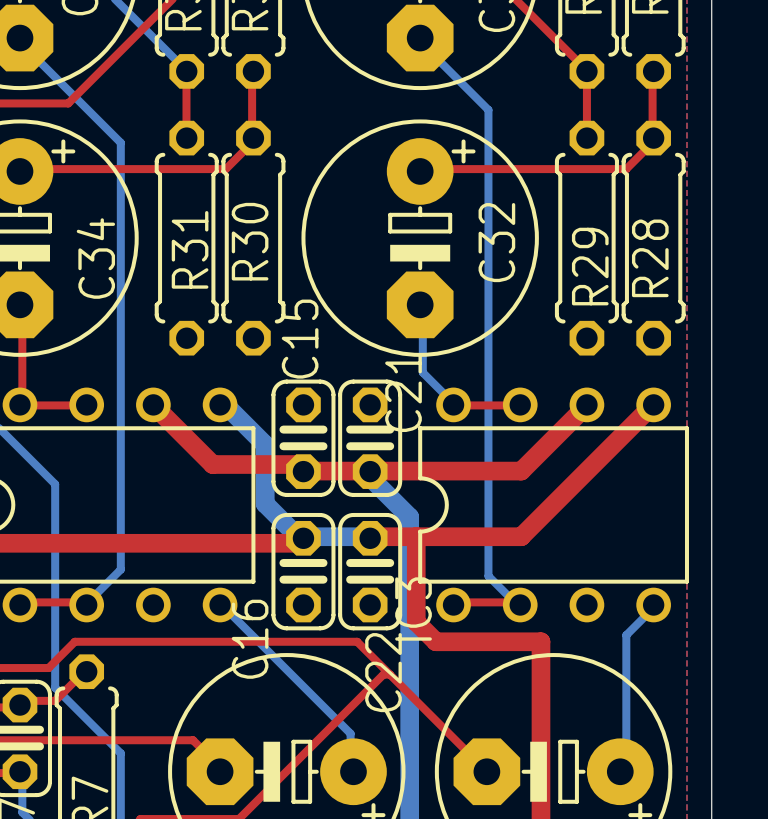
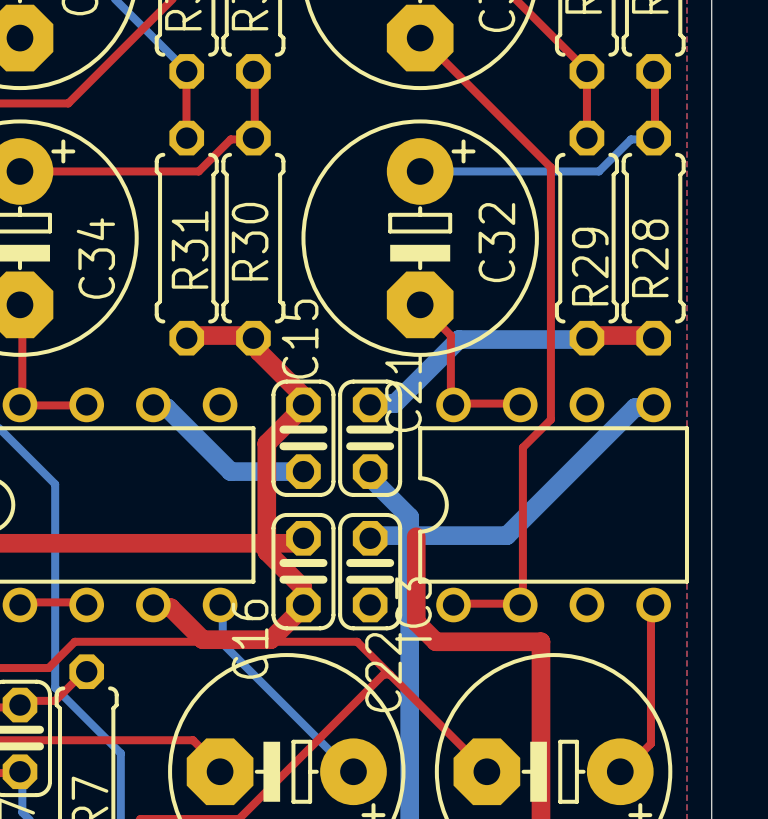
bottom track: (19, 38) (22, 44) (120, 142) (120, 569) (86, 605) -> none
bottom track: (420, 38) (422, 44) (488, 110) (488, 576) (514, 602) (520, 605) -> none
top track: (253, 71) (252, 142) (225, 169) (22, 169) (19, 171) -> (253, 71) (253, 138) (230, 139) (198, 171) (19, 171)
top track: (653, 71) (652, 142) (626, 169) (422, 169) (420, 171) -> (653, 71) (653, 138)
bottom track: none -> (653, 138) (630, 139) (598, 171) (420, 171)
bottom track: (420, 304) (422, 306) (422, 372) (453, 404) -> none
top track: none -> (186, 338) (186, 335) (250, 335) (258, 343) (258, 351) (302, 395) (303, 404) (298, 411) (266, 443) (266, 551) (302, 587) (303, 605) (270, 639) (202, 639) (170, 607) (154, 607) (153, 605)
top track: none -> (586, 338) (586, 335) (650, 335) (653, 338)
bottom track: none -> (586, 338) (458, 339) (394, 403) (370, 404)
top track: (153, 404) (212, 464) (298, 464) (303, 471) (521, 471) (586, 405) -> none
bottom track: none -> (153, 404) (154, 407) (166, 407) (230, 471) (303, 471)
bottom track: (220, 404) (225, 405) (265, 444) (265, 503) (298, 536) (370, 538) -> (653, 404) (650, 407) (634, 407) (506, 535) (370, 535) (370, 538)
top track: (453, 404) (520, 404) -> (420, 304) (450, 335) (450, 403) (520, 404)
top track: (653, 404) (521, 536) (370, 536) (370, 538) -> none
bottom track: (220, 605) (350, 733) (350, 766) (353, 771) -> (220, 605) (222, 607) (222, 643) (350, 771) (353, 771)
top track: (453, 605) (455, 602) (514, 602) (520, 605) -> (453, 605) (522, 603) (522, 447) (550, 419) (550, 167) (420, 38)
top track: none -> (653, 605) (650, 607) (650, 743) (622, 771) (620, 771)
bottom track: (653, 605) (652, 608) (626, 635) (626, 766) (620, 771) -> none

